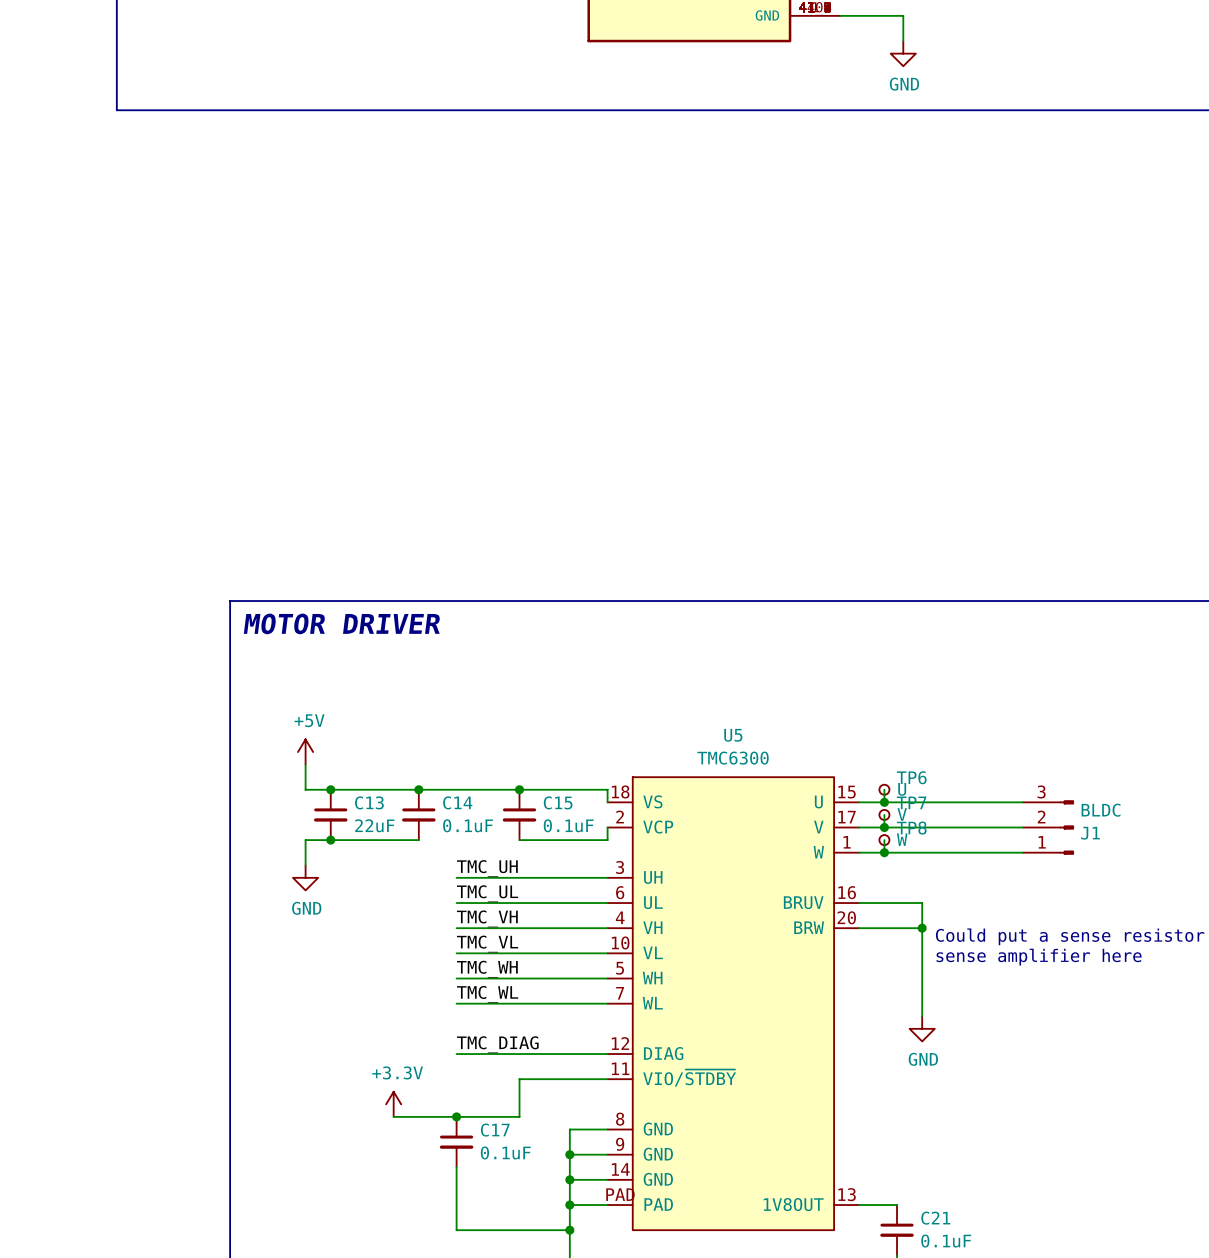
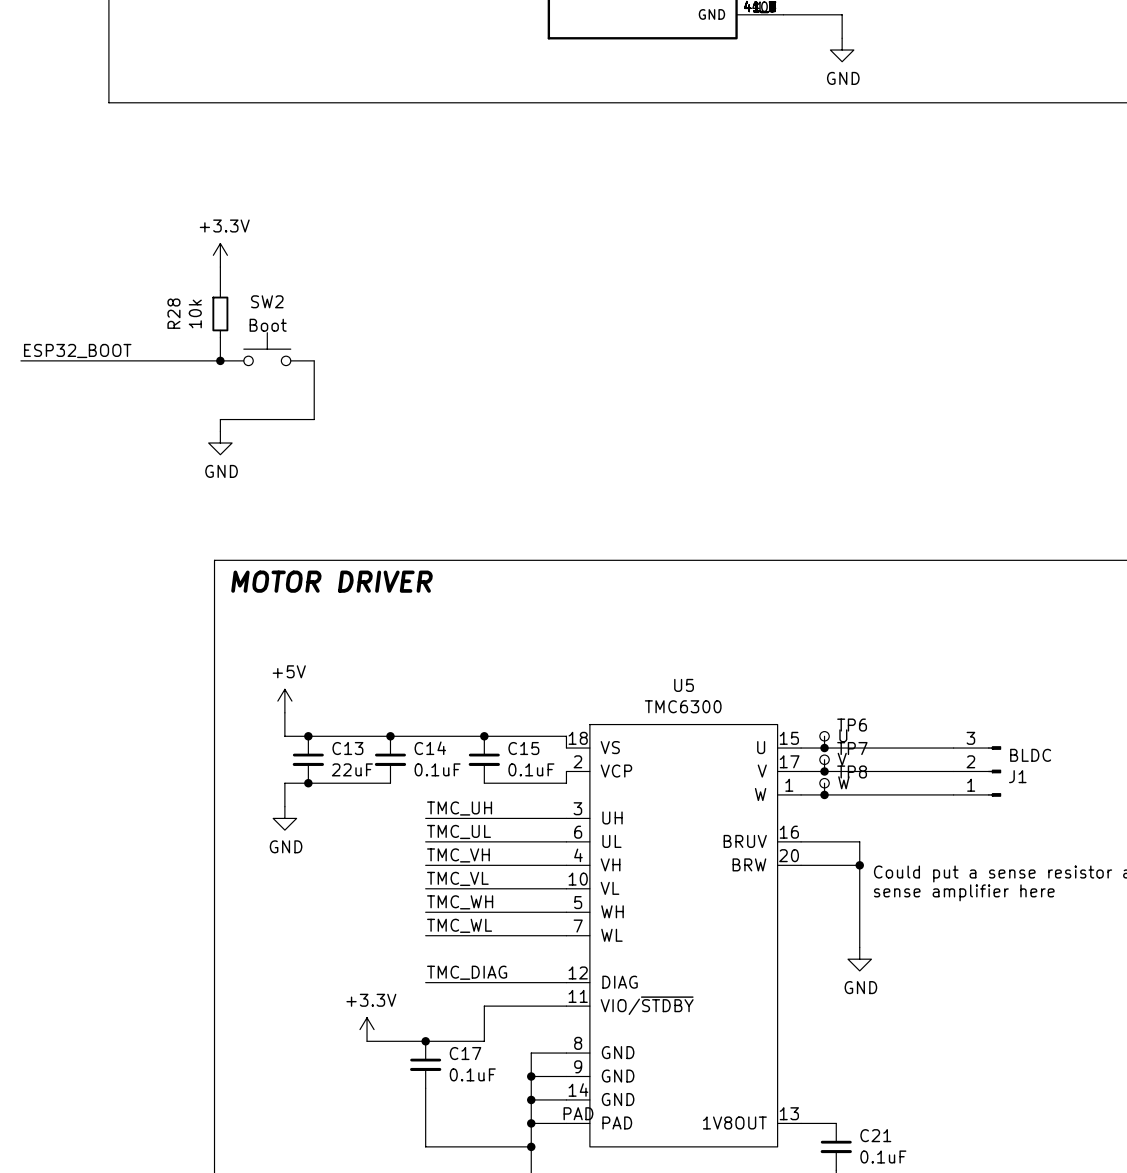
power symbol: none -> +3.3V (220, 255)
wire: none -> (220, 267) (220, 290)
R28: none -> 10k (220, 313)
wire: none -> (220, 337) (220, 360) (20, 360)
SW2: none -> Boot (267, 349)
label: none -> ESP32_BOOT (77, 350)
junction: none -> (220, 360)
wire: none -> (314, 360) (314, 419) (220, 419) (220, 431)
power symbol: none -> GND (220, 443)

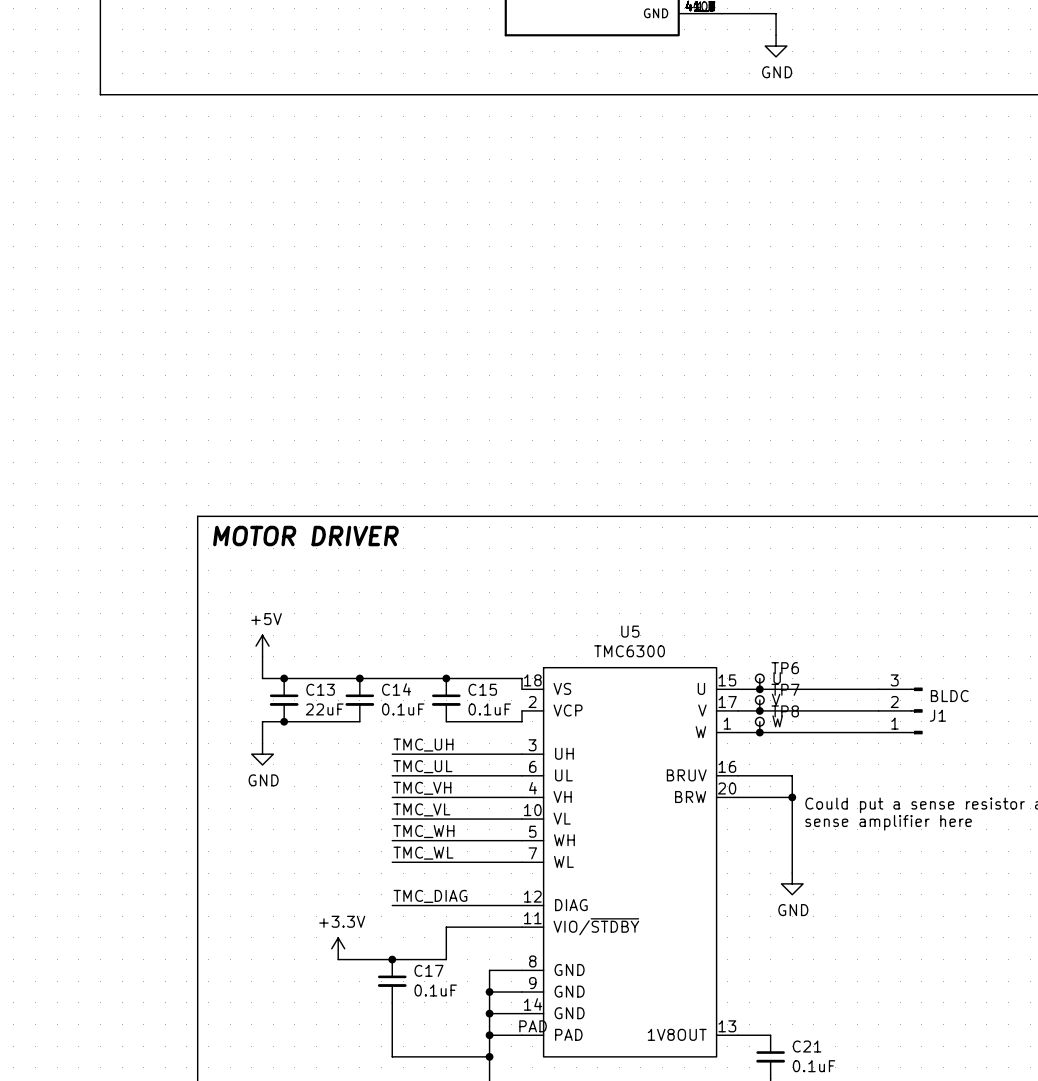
power symbol: +3.3V (220, 255) -> none
wire: (220, 267) (220, 290) -> none
R28: 10k (220, 313) -> none
wire: (220, 337) (220, 360) (20, 360) -> none
SW2: Boot (267, 349) -> none
label: ESP32_BOOT (77, 350) -> none
junction: (220, 360) -> none
wire: (314, 360) (314, 419) (220, 419) (220, 431) -> none
power symbol: GND (220, 443) -> none

